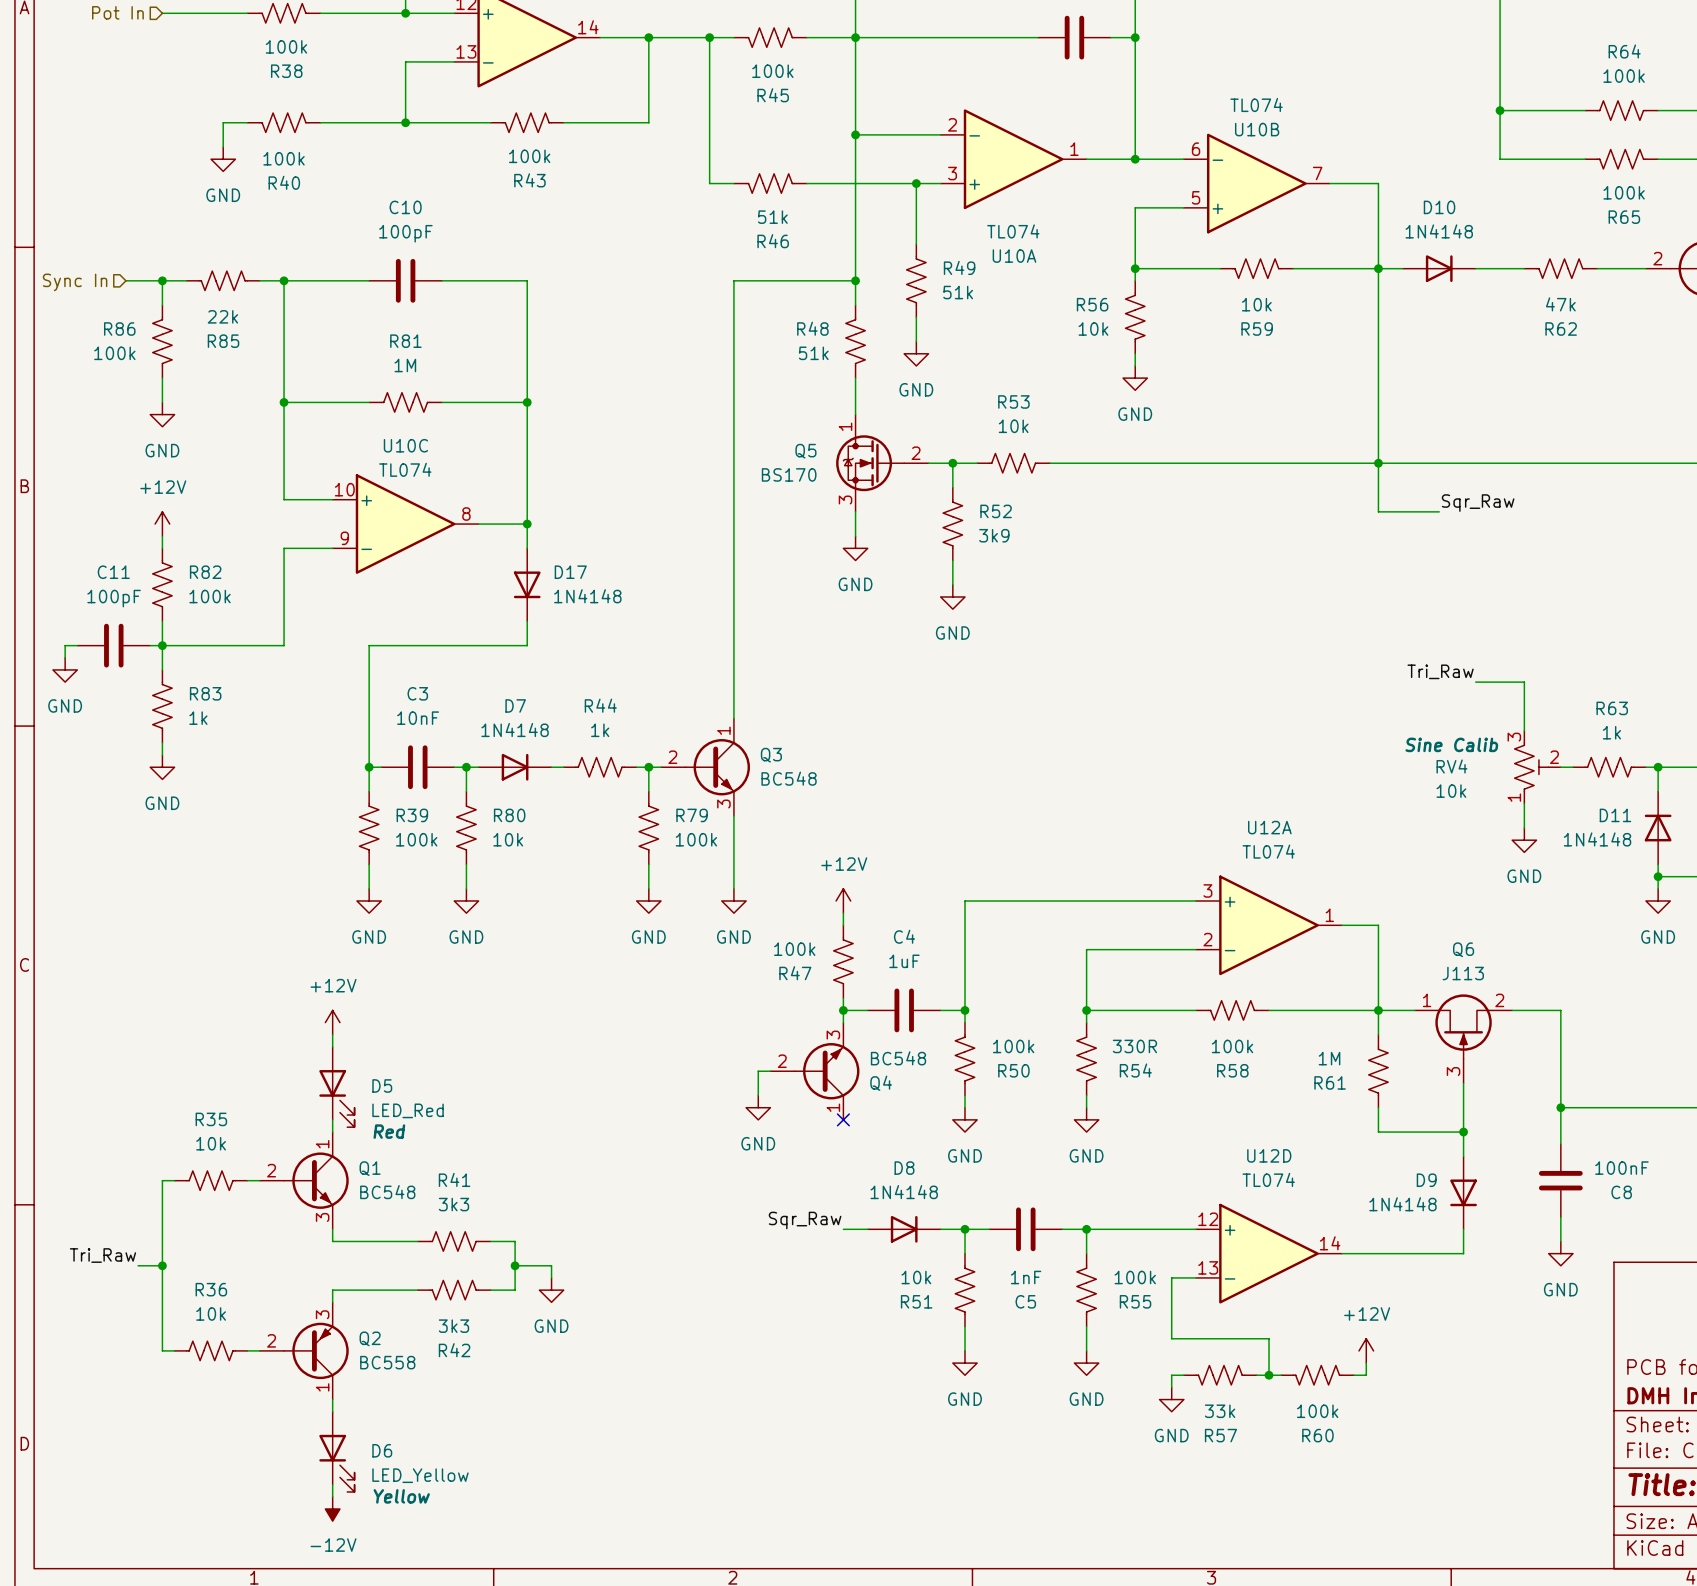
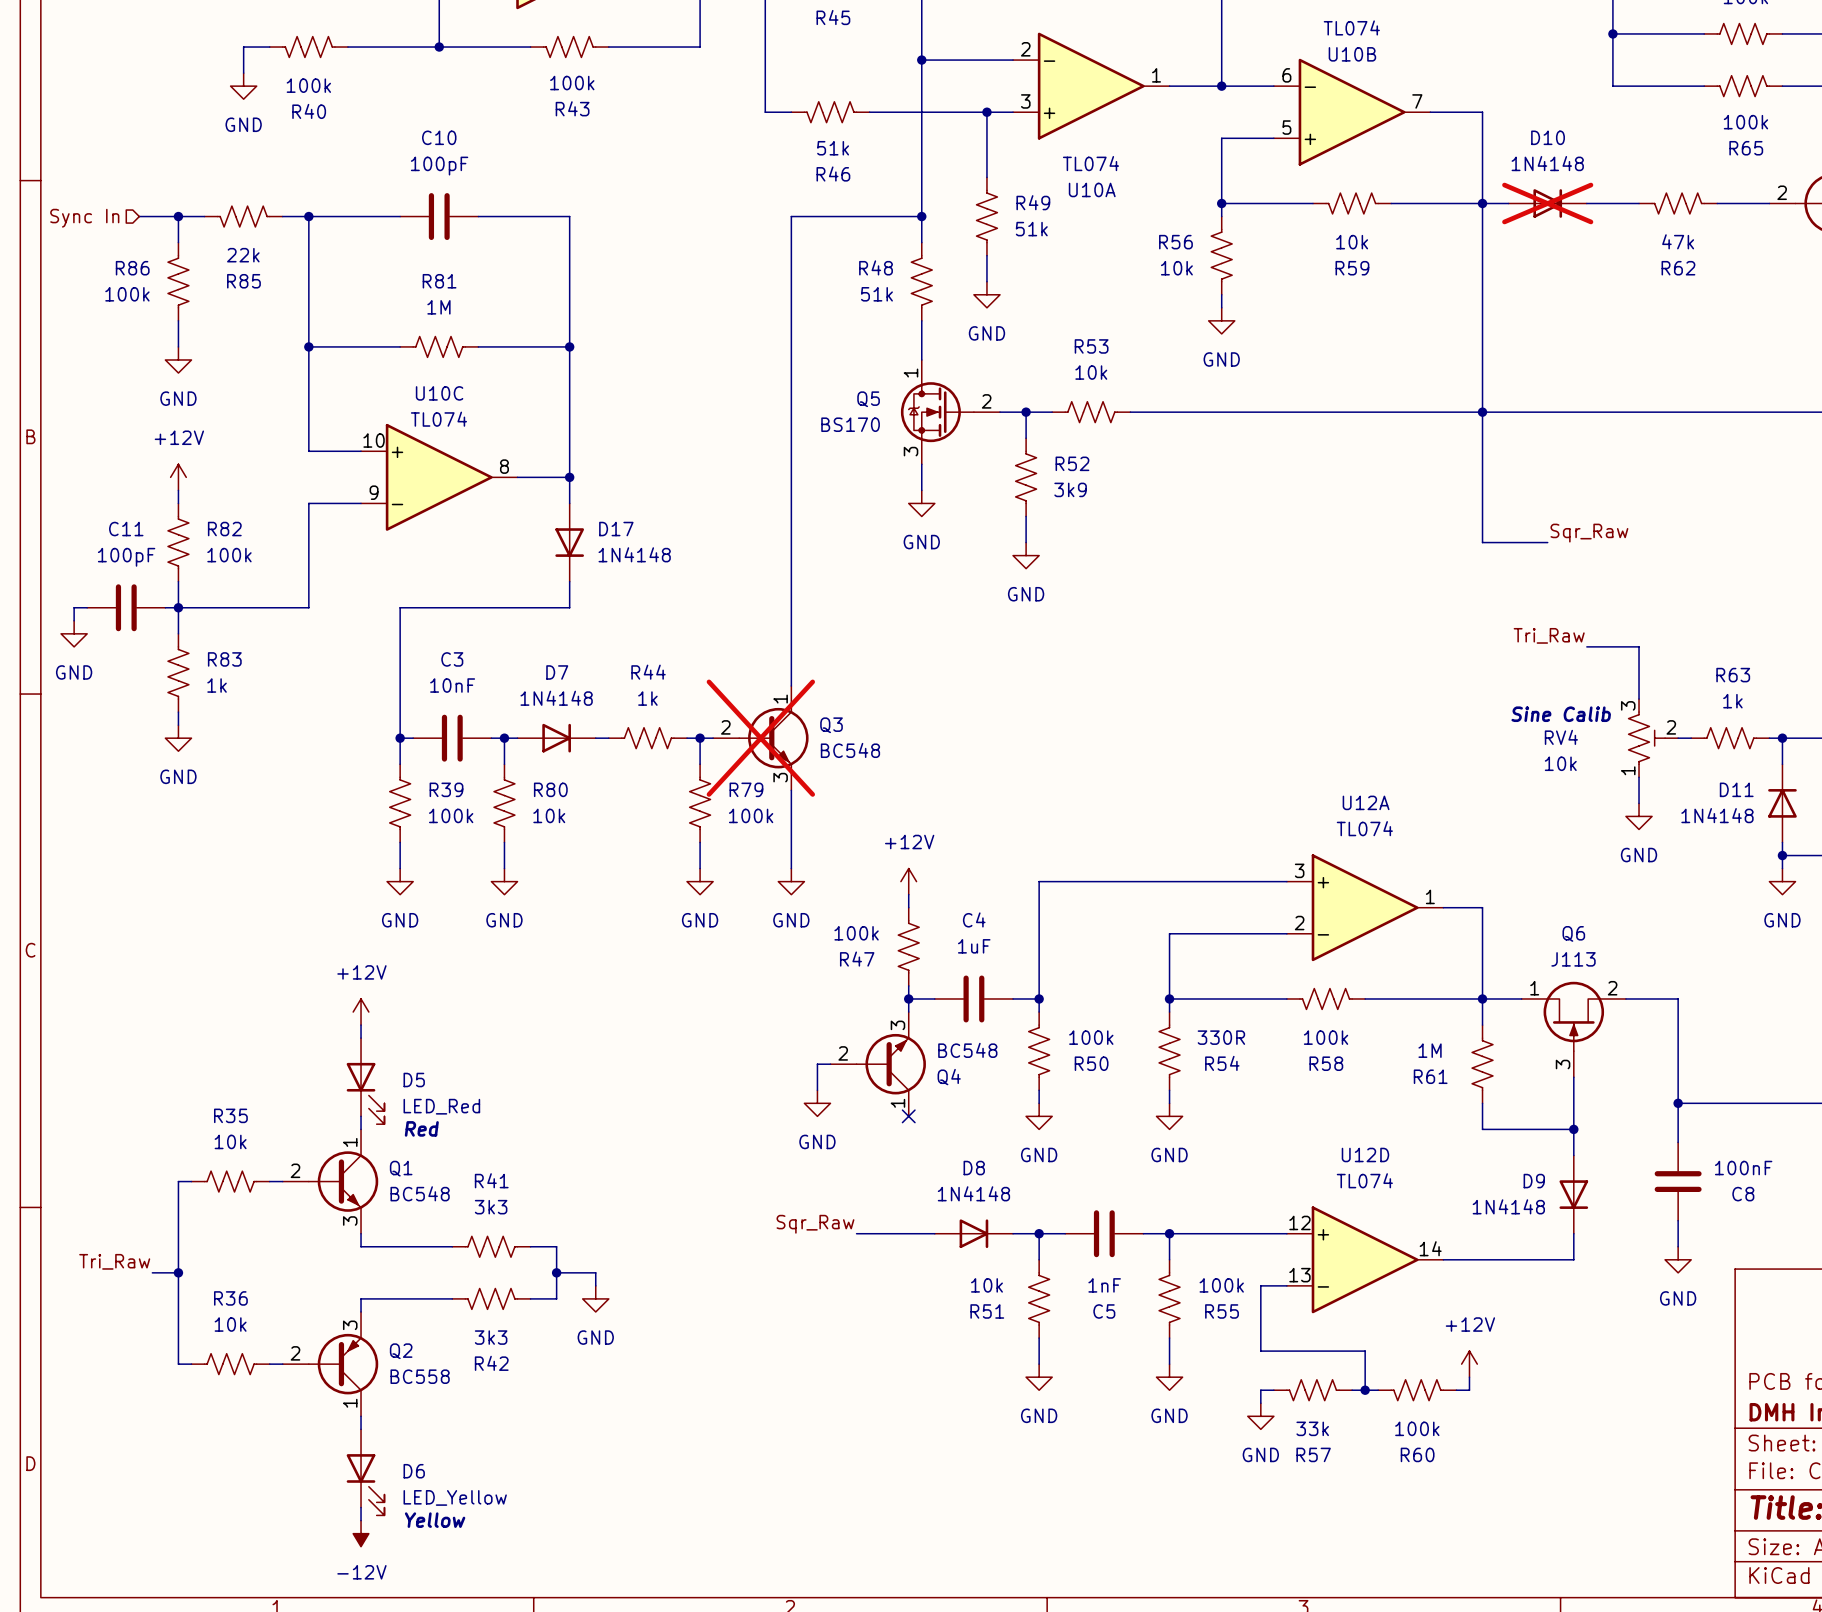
D10 do-not-place cross: none -> (1547, 203)
label position: Sqr_Raw (1478, 503) -> Sqr_Raw (1589, 533)
wire: (1378, 511) (1439, 511) -> (1482, 464) (1482, 542) (1547, 542)
Q3 do-not-place cross: none -> (760, 738)
label position: Sqr_Raw (805, 1220) -> Sqr_Raw (815, 1224)
wire: none -> (856, 1233) (908, 1233)

